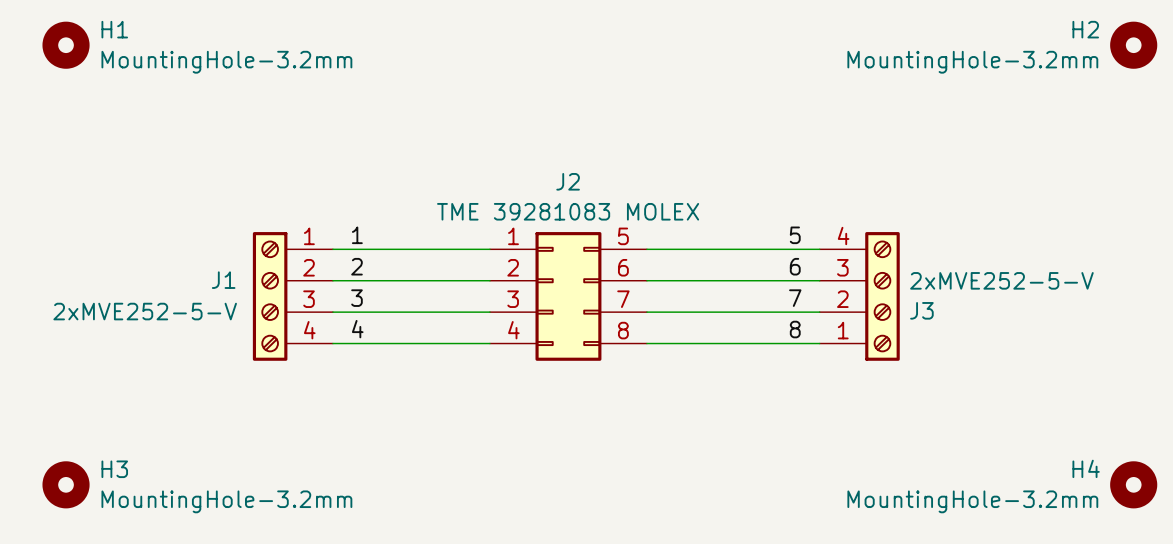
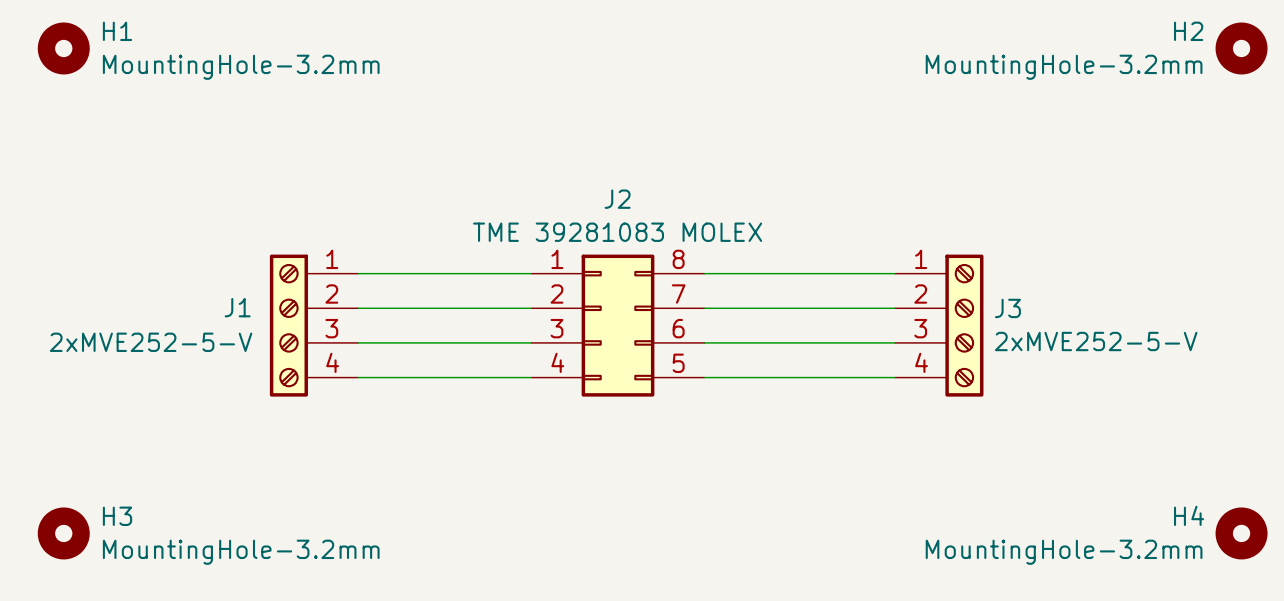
label: 1 (357, 235) -> none
label: 5 (795, 235) -> none
J2 pin number: 5 (623, 236) -> 8 (678, 259)
label: 2 (356, 266) -> none
label: 6 (795, 266) -> none
J2 pin number: 6 (623, 267) -> 7 (678, 294)
J3 flip: as is (882, 296) -> up-down (964, 325)
label: 3 (356, 298) -> none
label: 7 (795, 298) -> none
J2 pin number: 7 (623, 299) -> 6 (678, 328)
label: 4 (357, 329) -> none
label: 8 (795, 329) -> none
J2 pin number: 8 (623, 330) -> 5 (678, 363)

